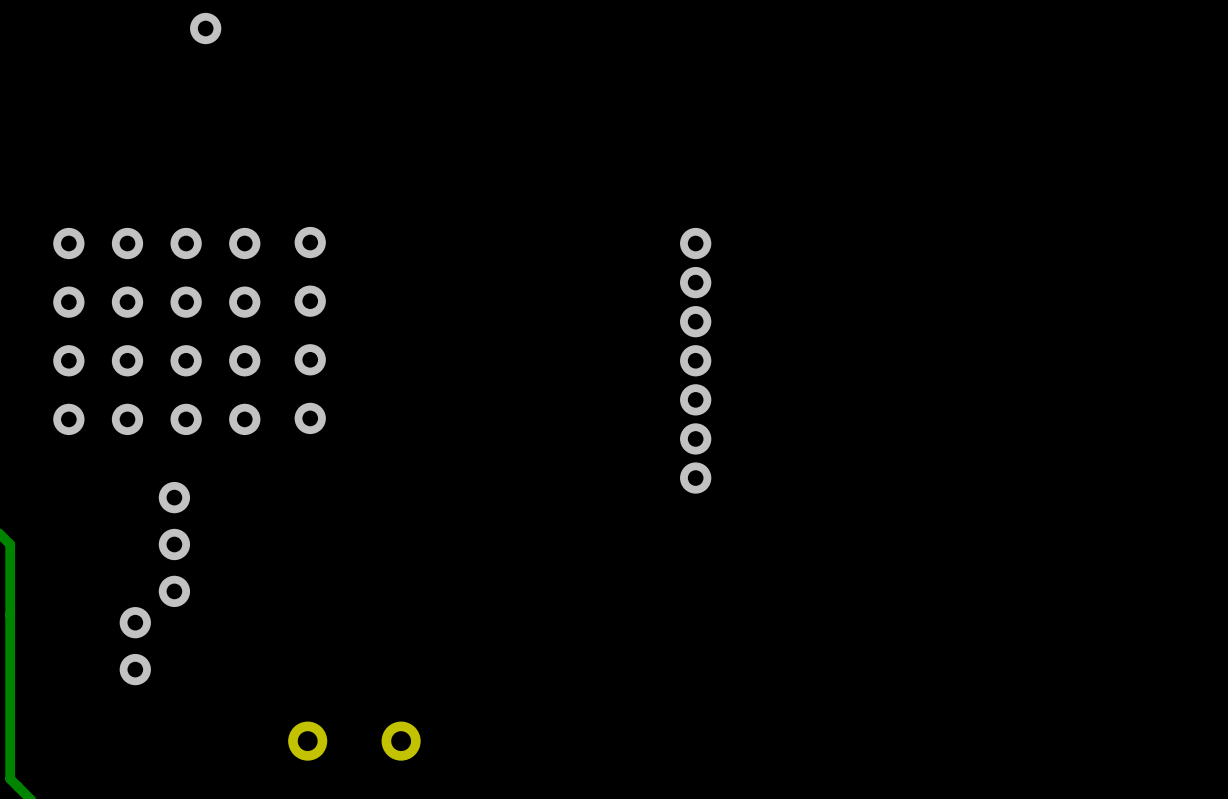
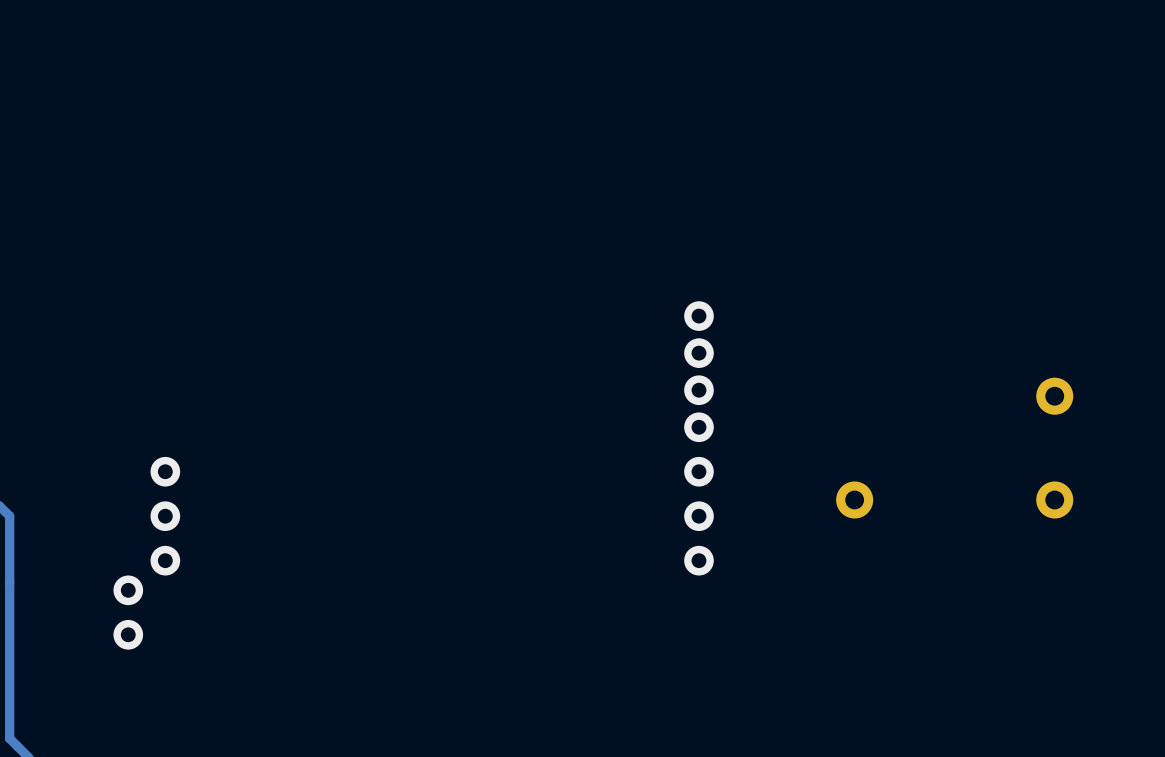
via: (205, 28) -> none
via: (310, 242) -> none
via: (68, 243) -> none
via: (127, 243) -> none
via: (186, 243) -> none
via: (244, 243) -> none
via: (695, 243) -> none
via: (695, 282) -> none
via: (310, 301) -> none
via: (68, 302) -> none
via: (127, 302) -> none
via: (186, 302) -> none
via: (244, 302) -> none
via: (695, 321) -> none
via: none -> (698, 316)
via: (310, 359) -> none
via: (68, 360) -> none
via: (127, 360) -> none
via: (186, 360) -> none
via: (244, 360) -> none
via: (695, 360) -> none
via: none -> (698, 353)
via: (695, 399) -> none
via: none -> (698, 390)
part: none -> (1054, 396)
via: (310, 418) -> none
via: (68, 419) -> none
via: (127, 419) -> none
via: (186, 419) -> none
via: (244, 419) -> none
via: (695, 438) -> none
via: none -> (698, 427)
via: (695, 478) -> none
via: none -> (698, 471)
part: none -> (854, 499)
part: none -> (1054, 499)
via: none -> (698, 516)
via: none -> (698, 560)
part: (307, 741) -> none
part: (401, 741) -> none

